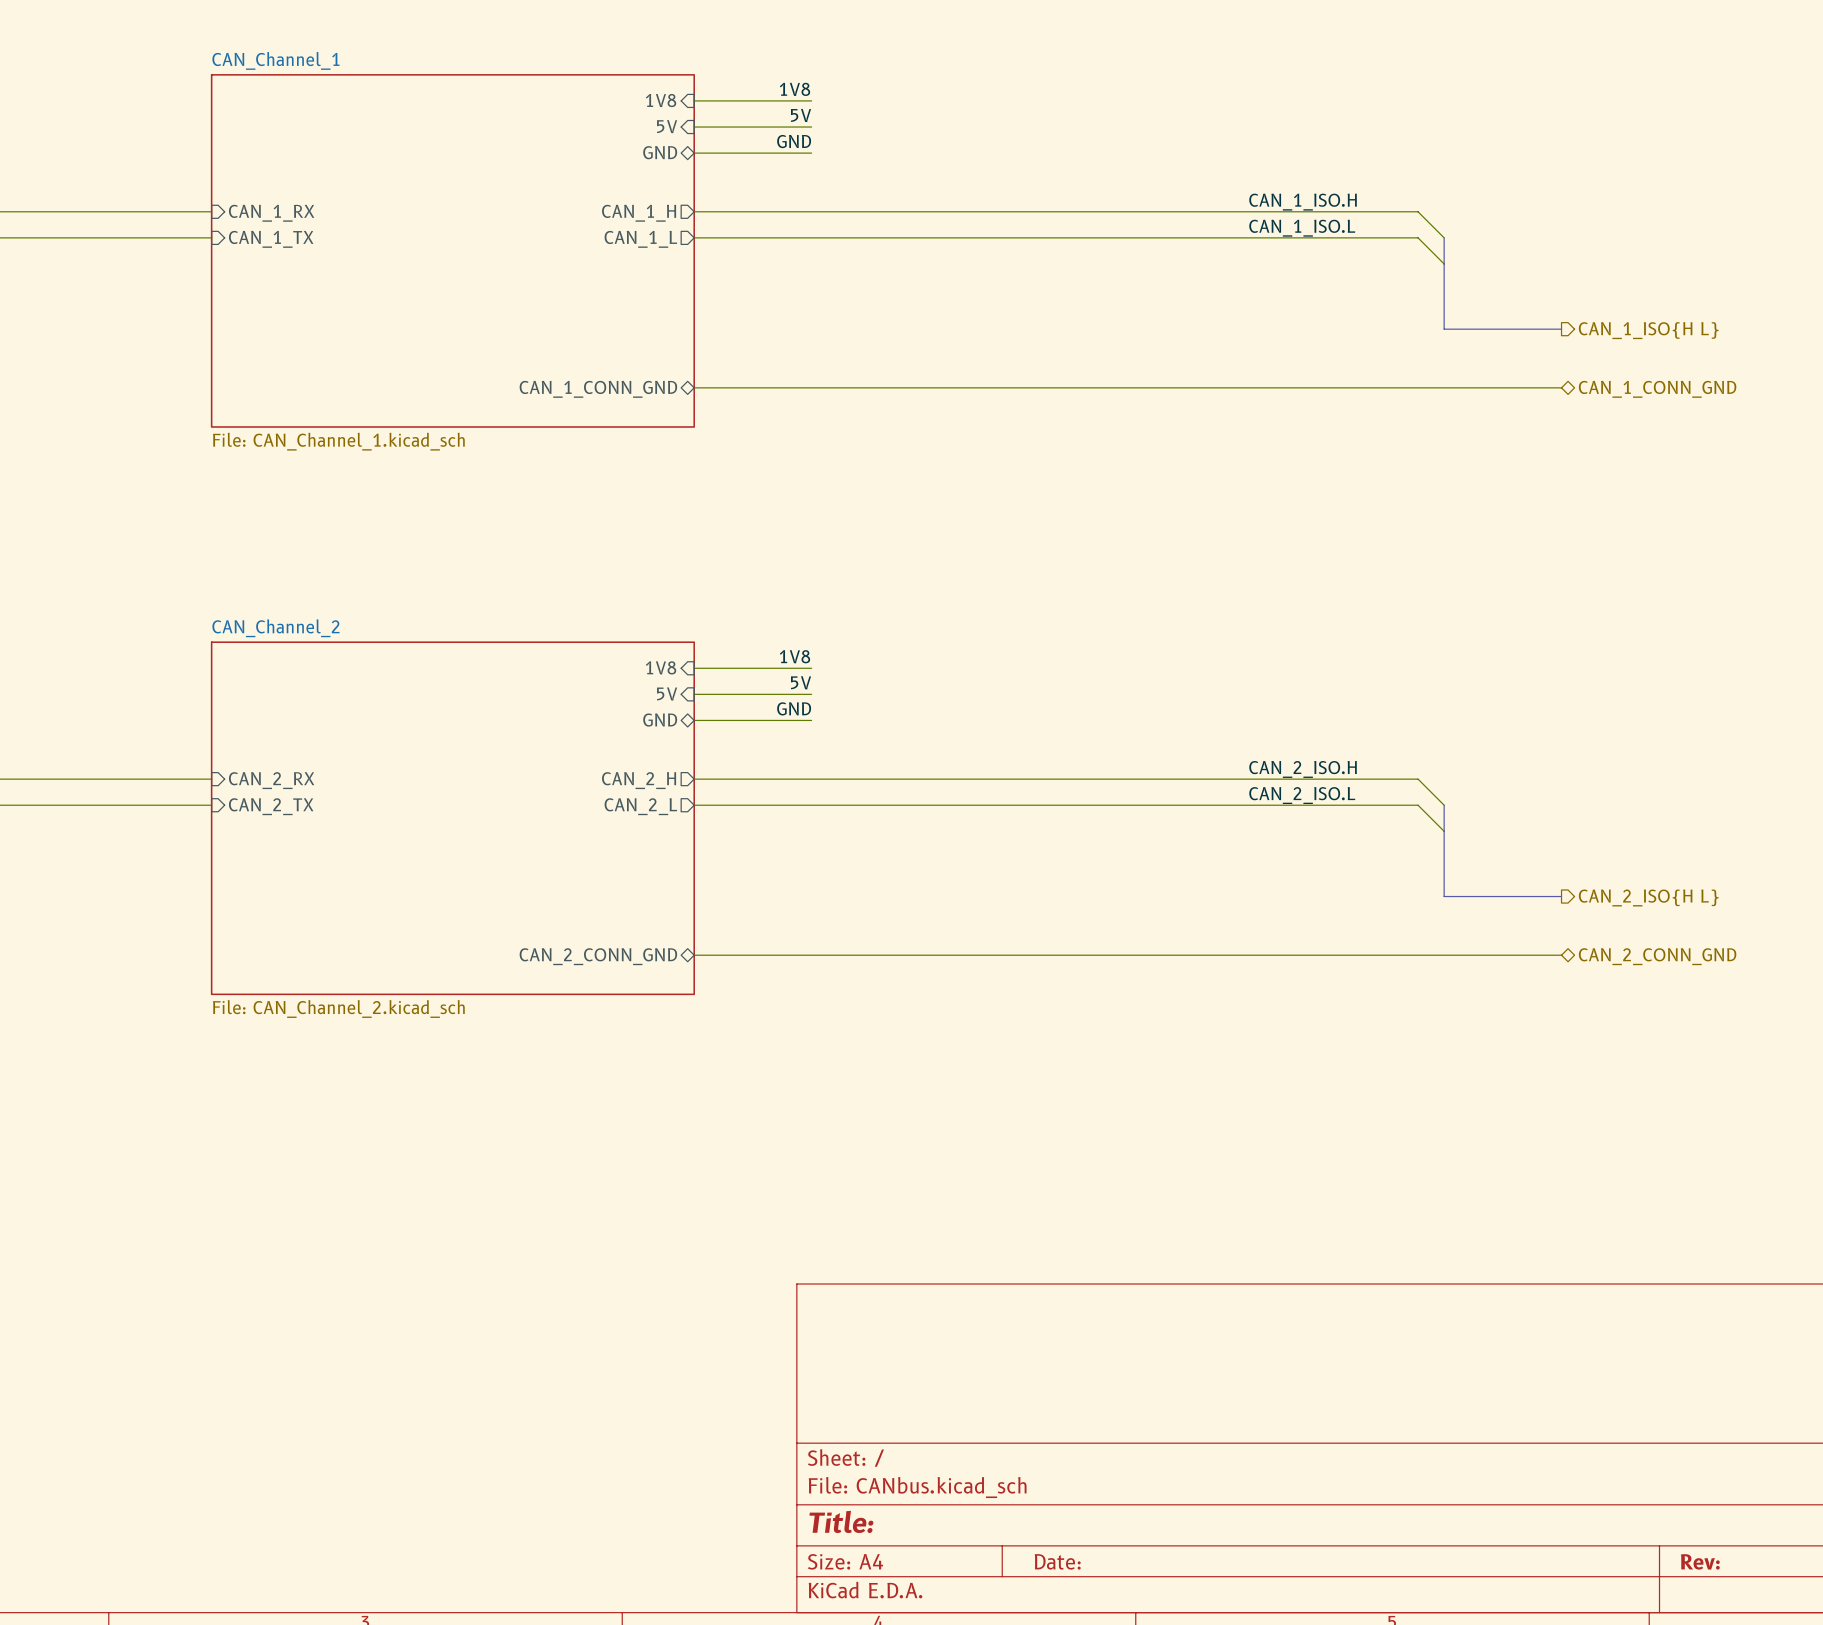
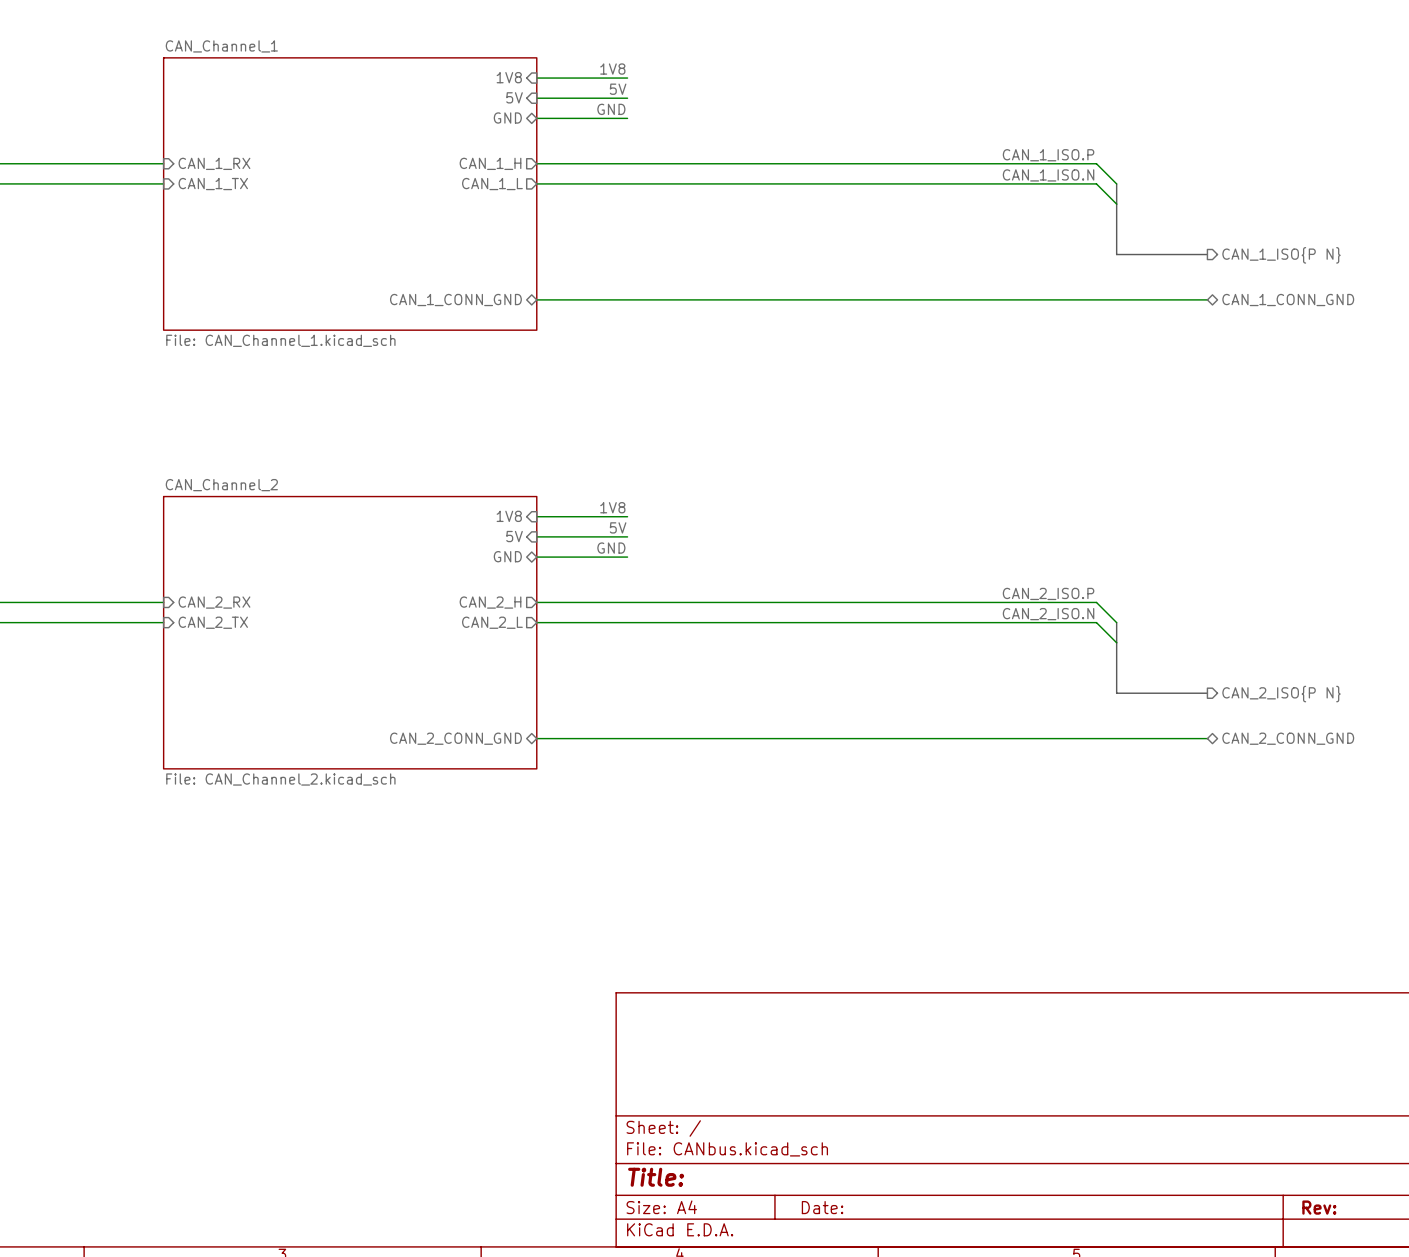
label: CAN_1_ISO.H (1303, 202) -> none
label: none -> CAN_1_ISO.P (1048, 155)
label: CAN_1_ISO.L (1302, 228) -> none
label: none -> CAN_1_ISO.N (1048, 175)
hierarchical label: CAN_1_ISO{H L} (1648, 330) -> CAN_1_ISO{P N} (1281, 255)
label: CAN_2_ISO.H (1303, 769) -> none
label: none -> CAN_2_ISO.P (1048, 593)
label: CAN_2_ISO.L (1302, 795) -> none
label: none -> CAN_2_ISO.N (1048, 614)
hierarchical label: CAN_2_ISO{H L} (1648, 897) -> CAN_2_ISO{P N} (1281, 694)

